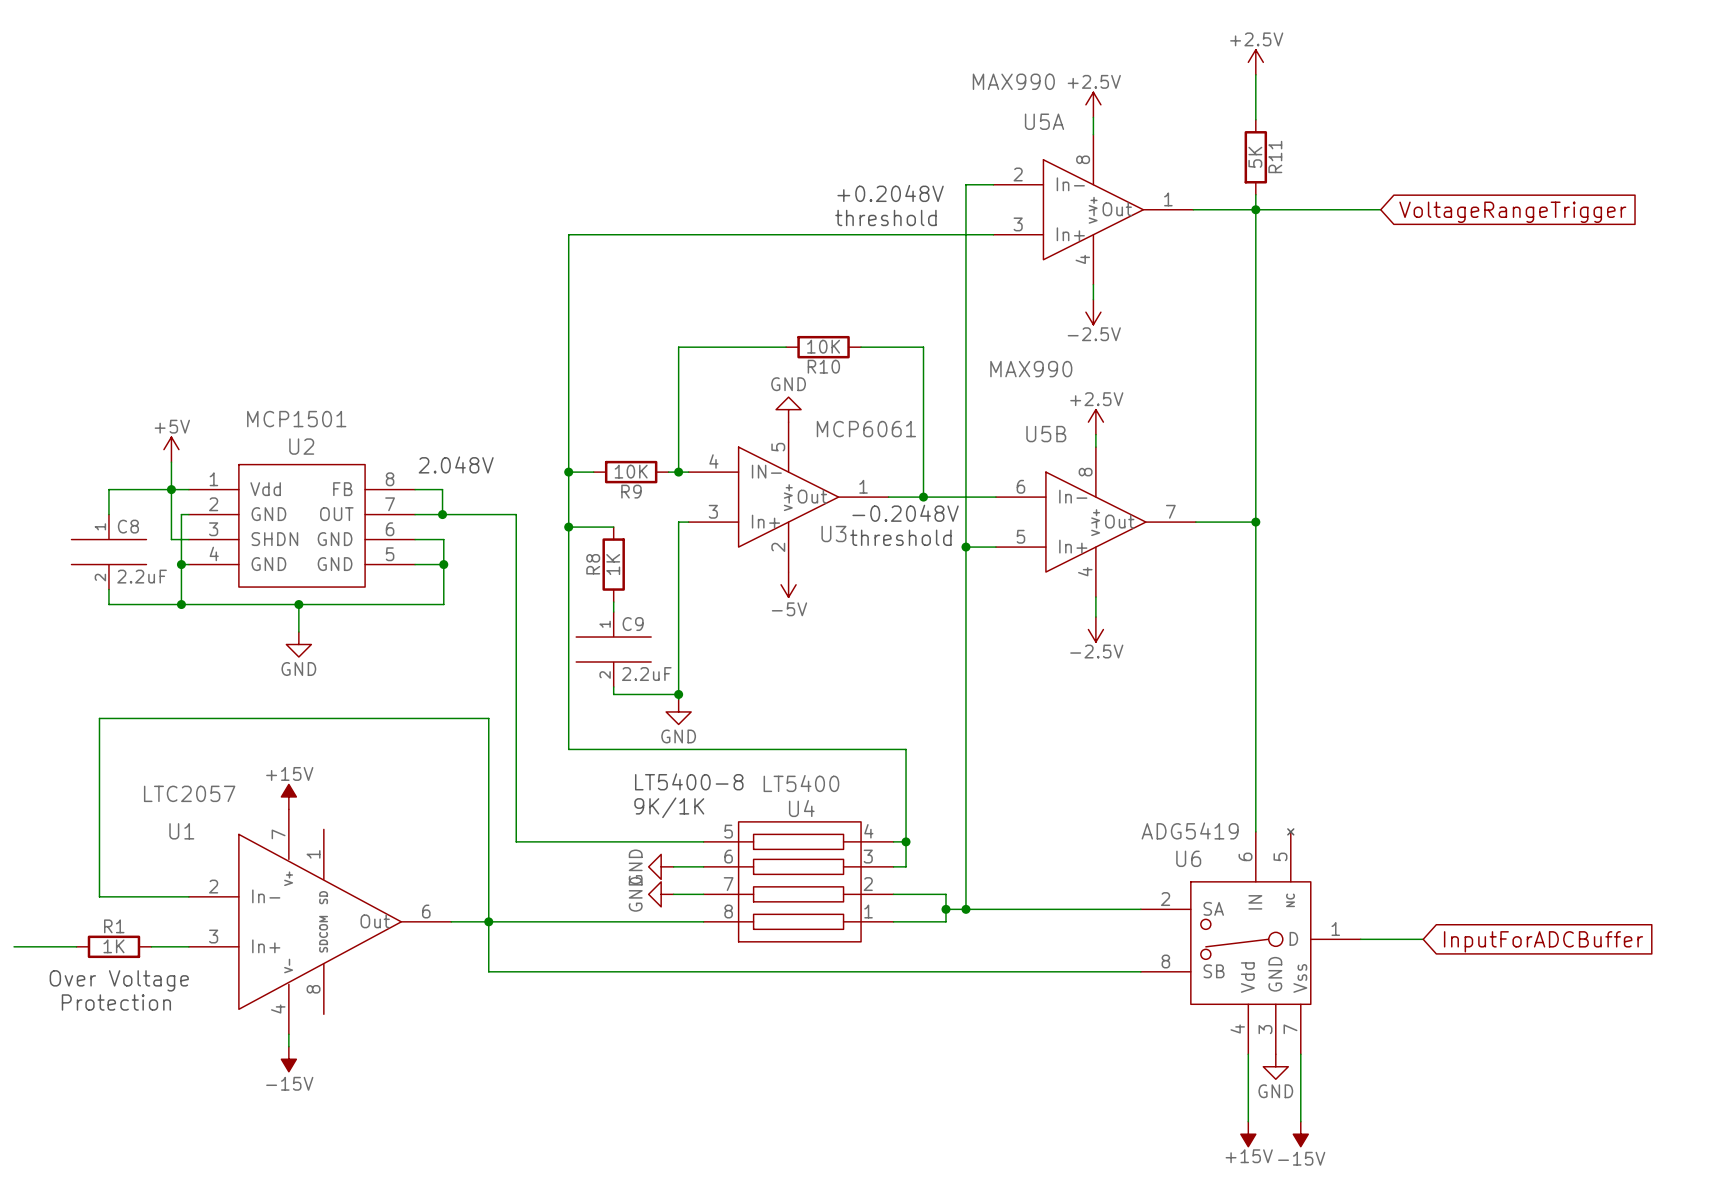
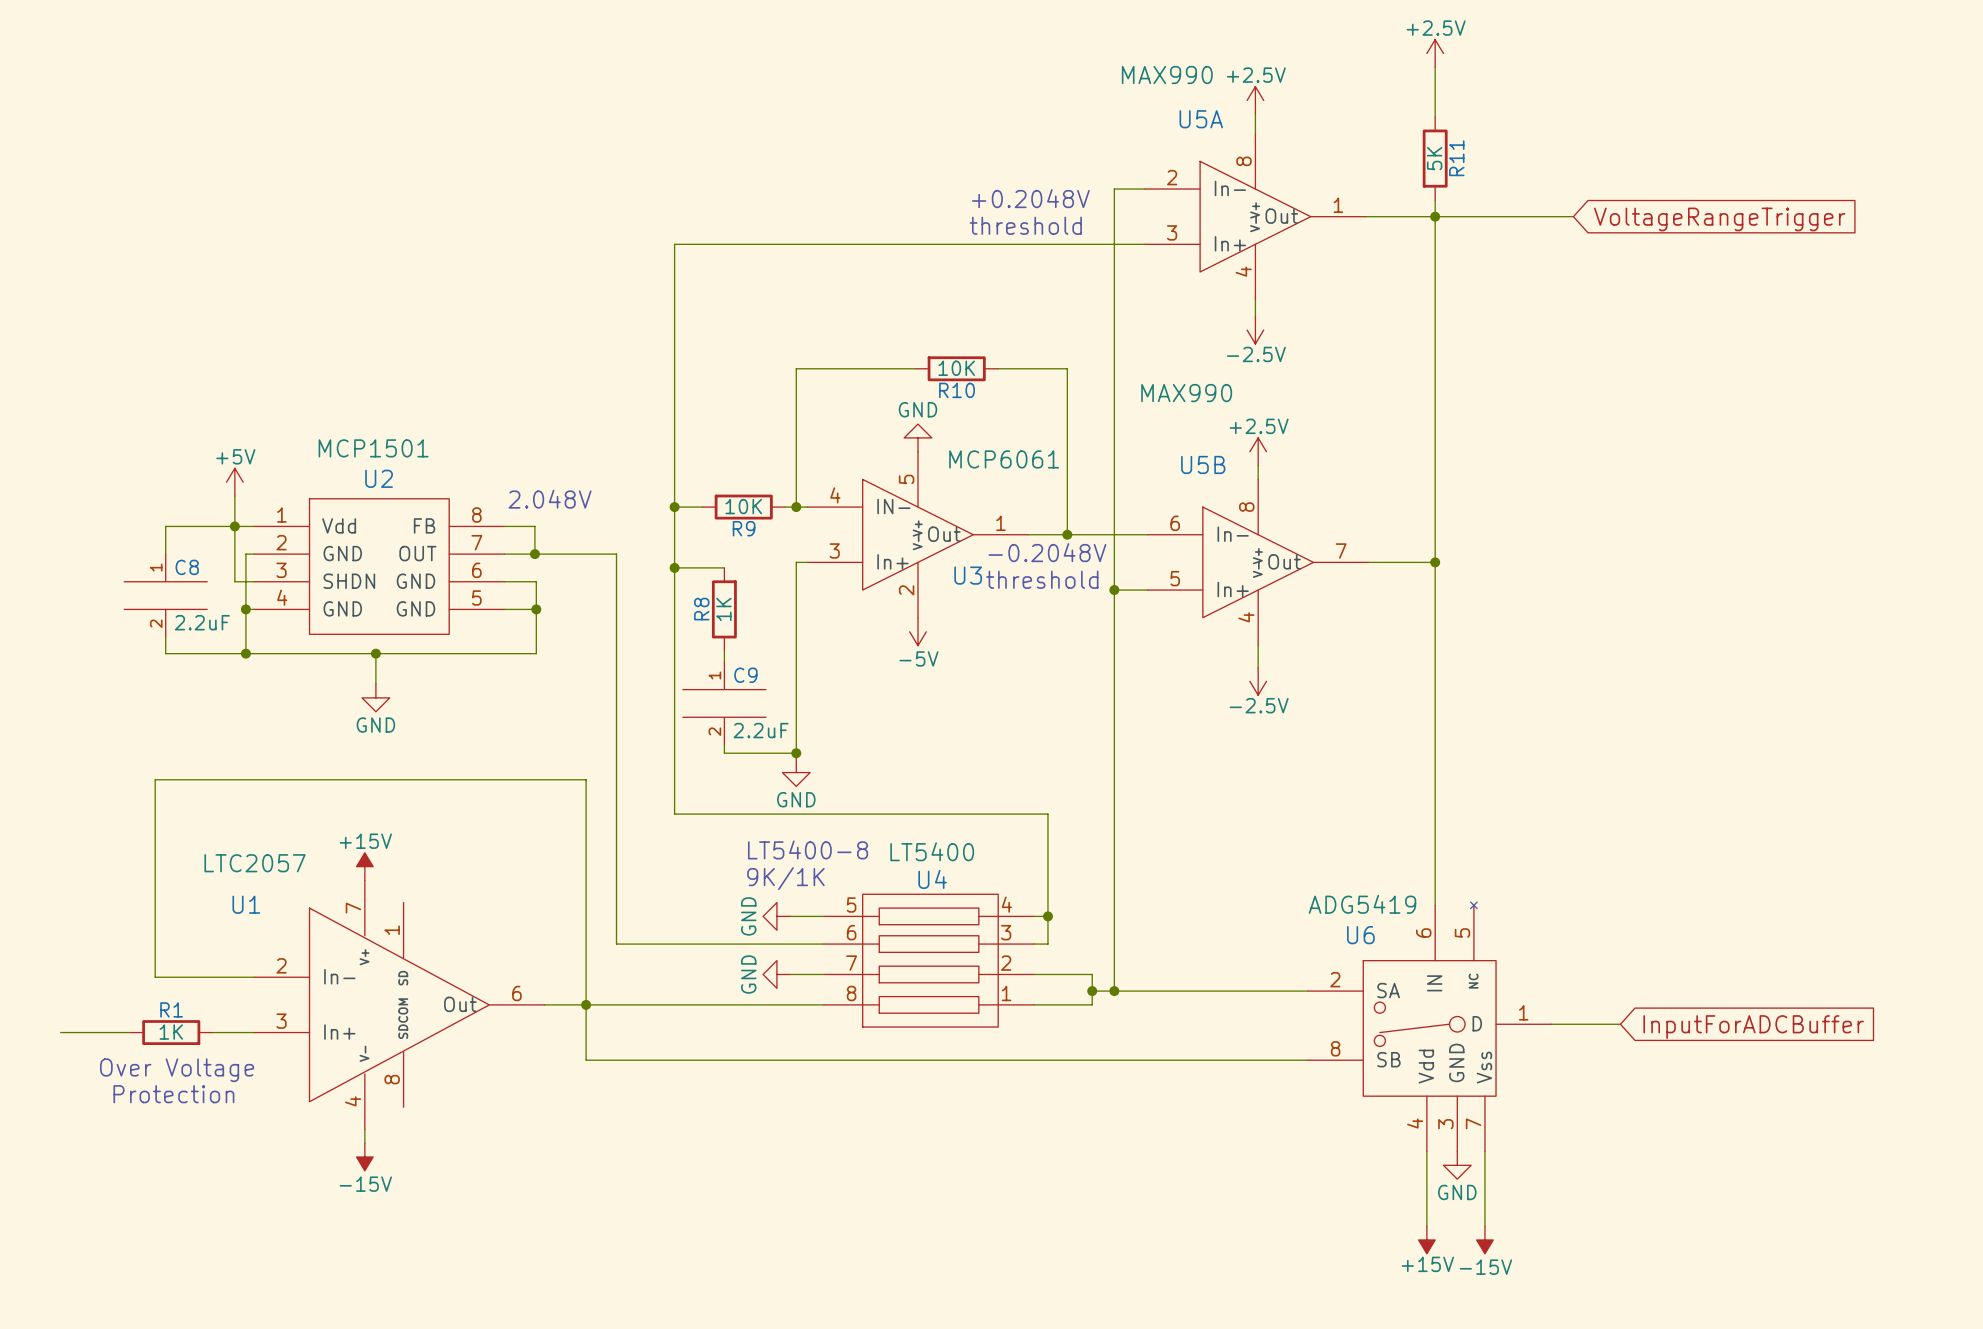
wire: (516, 841) (673, 841) -> (616, 916) (616, 944) (790, 944)
power symbol position: GND (661, 866) -> GND (776, 916)

